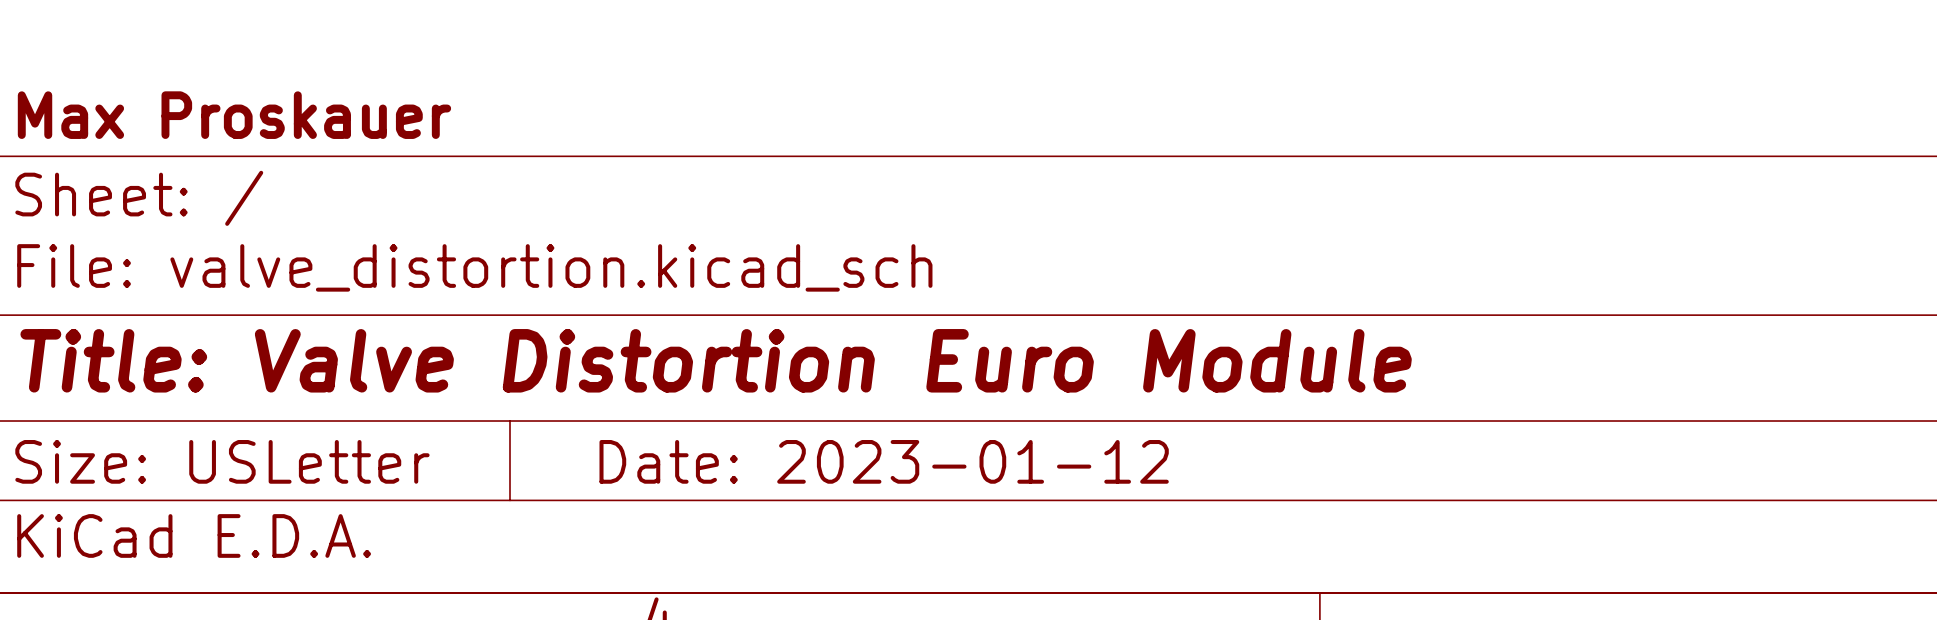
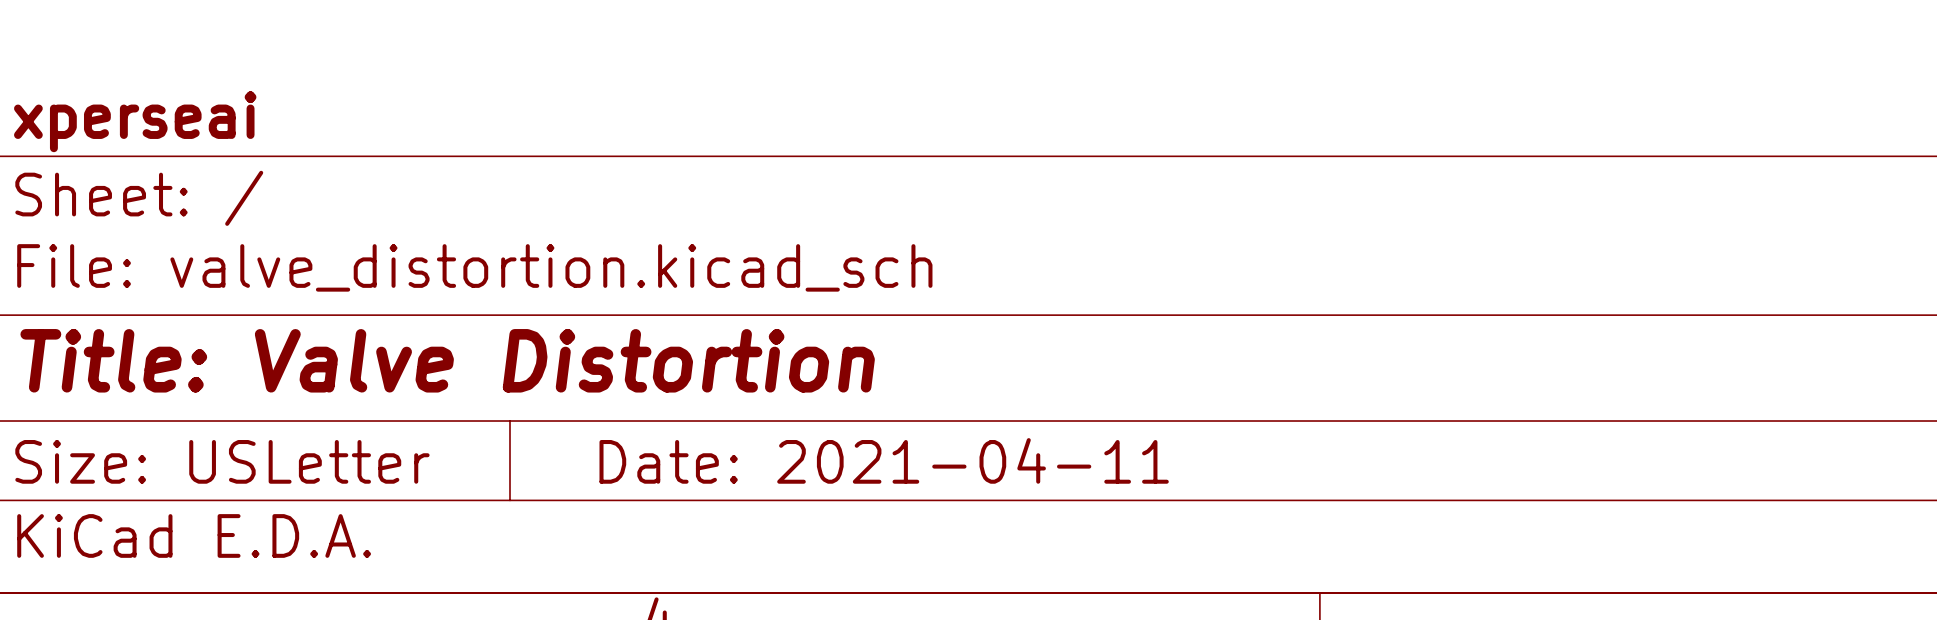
title block: Max Proskauer (234, 115) -> xperseai (135, 121)
title block: Title: Valve Distortion Euro Module (716, 360) -> Title: Valve Distortion (447, 360)
title block: Date: 2023-01-12 (884, 461) -> Date: 2021-04-11 (884, 460)

